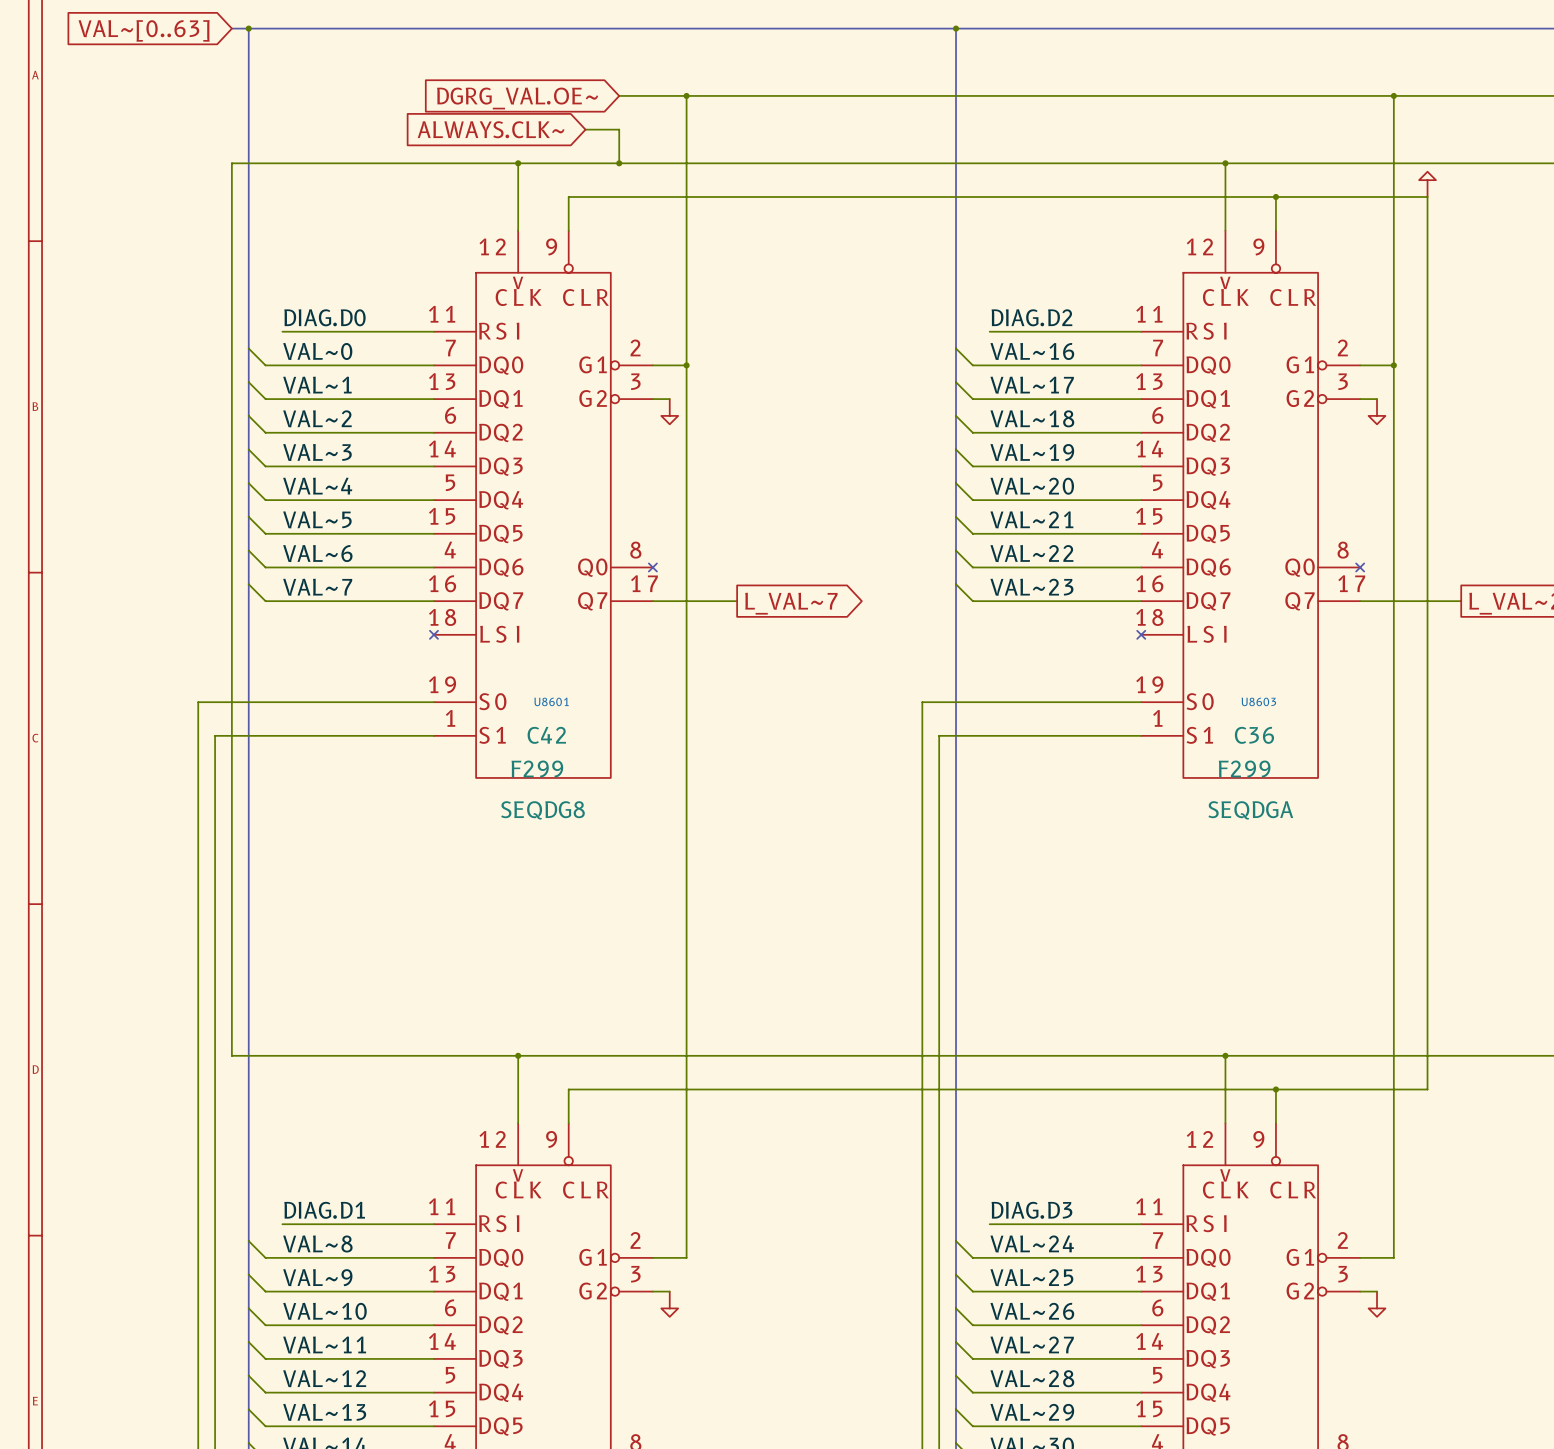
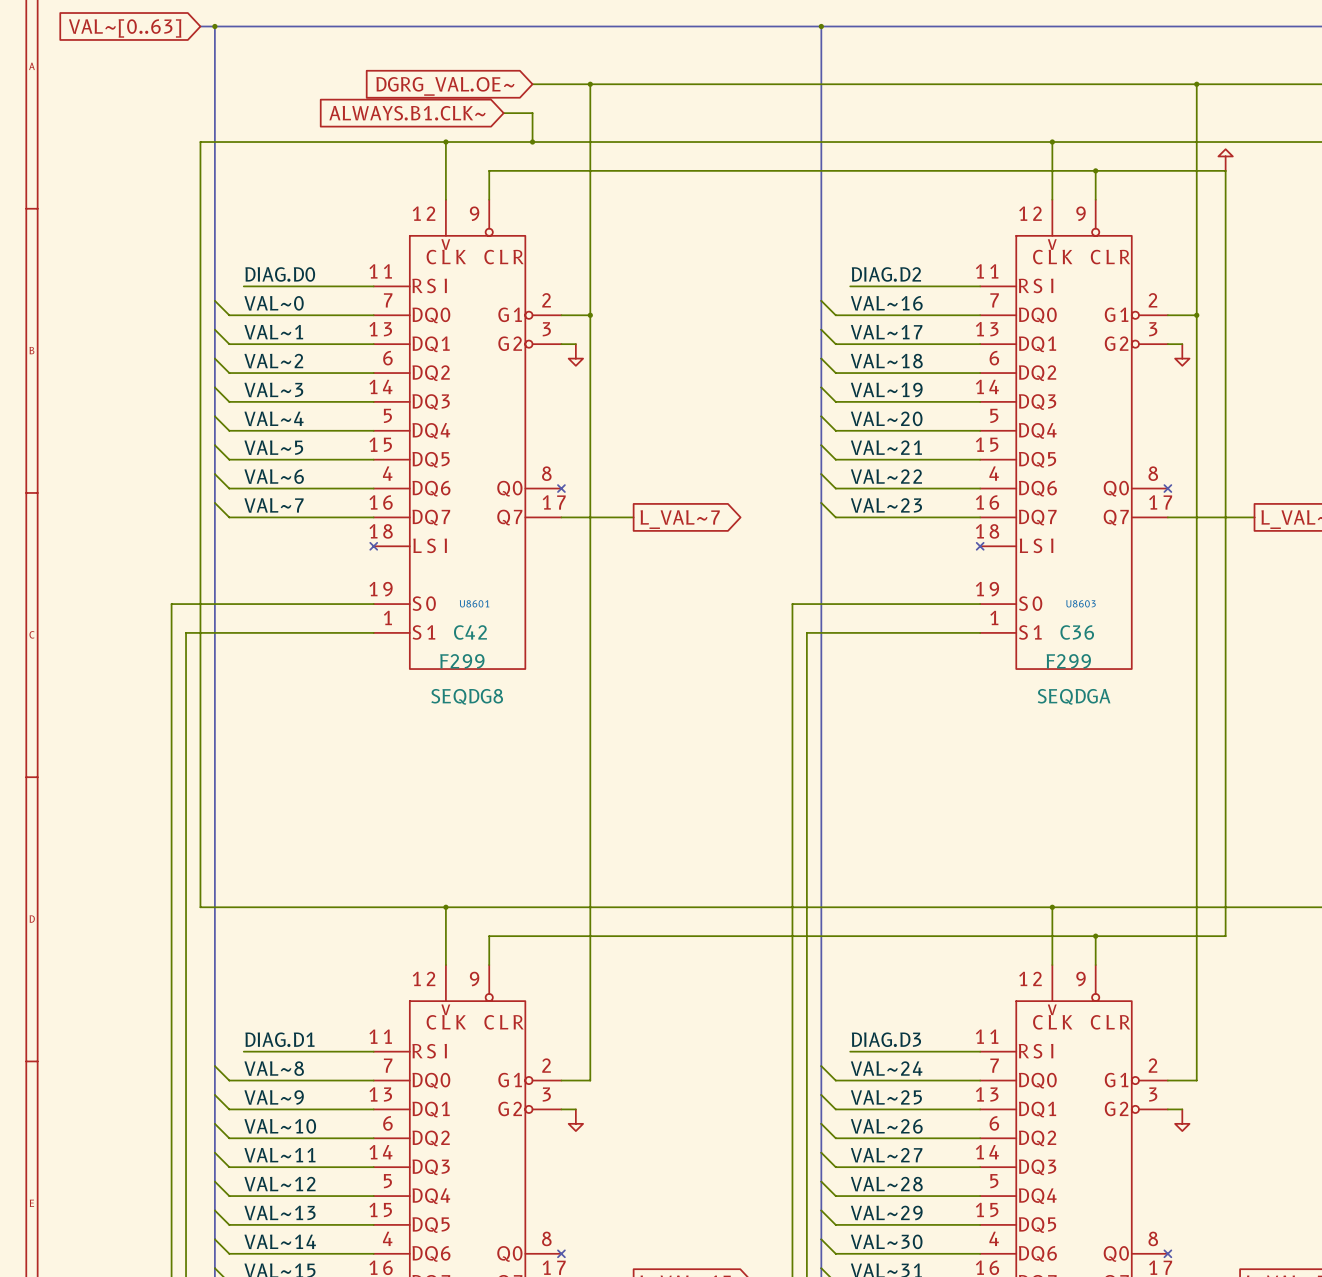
global label: ALWAYS.CLK~ (491, 129) -> ALWAYS.B1.CLK~ (407, 113)

